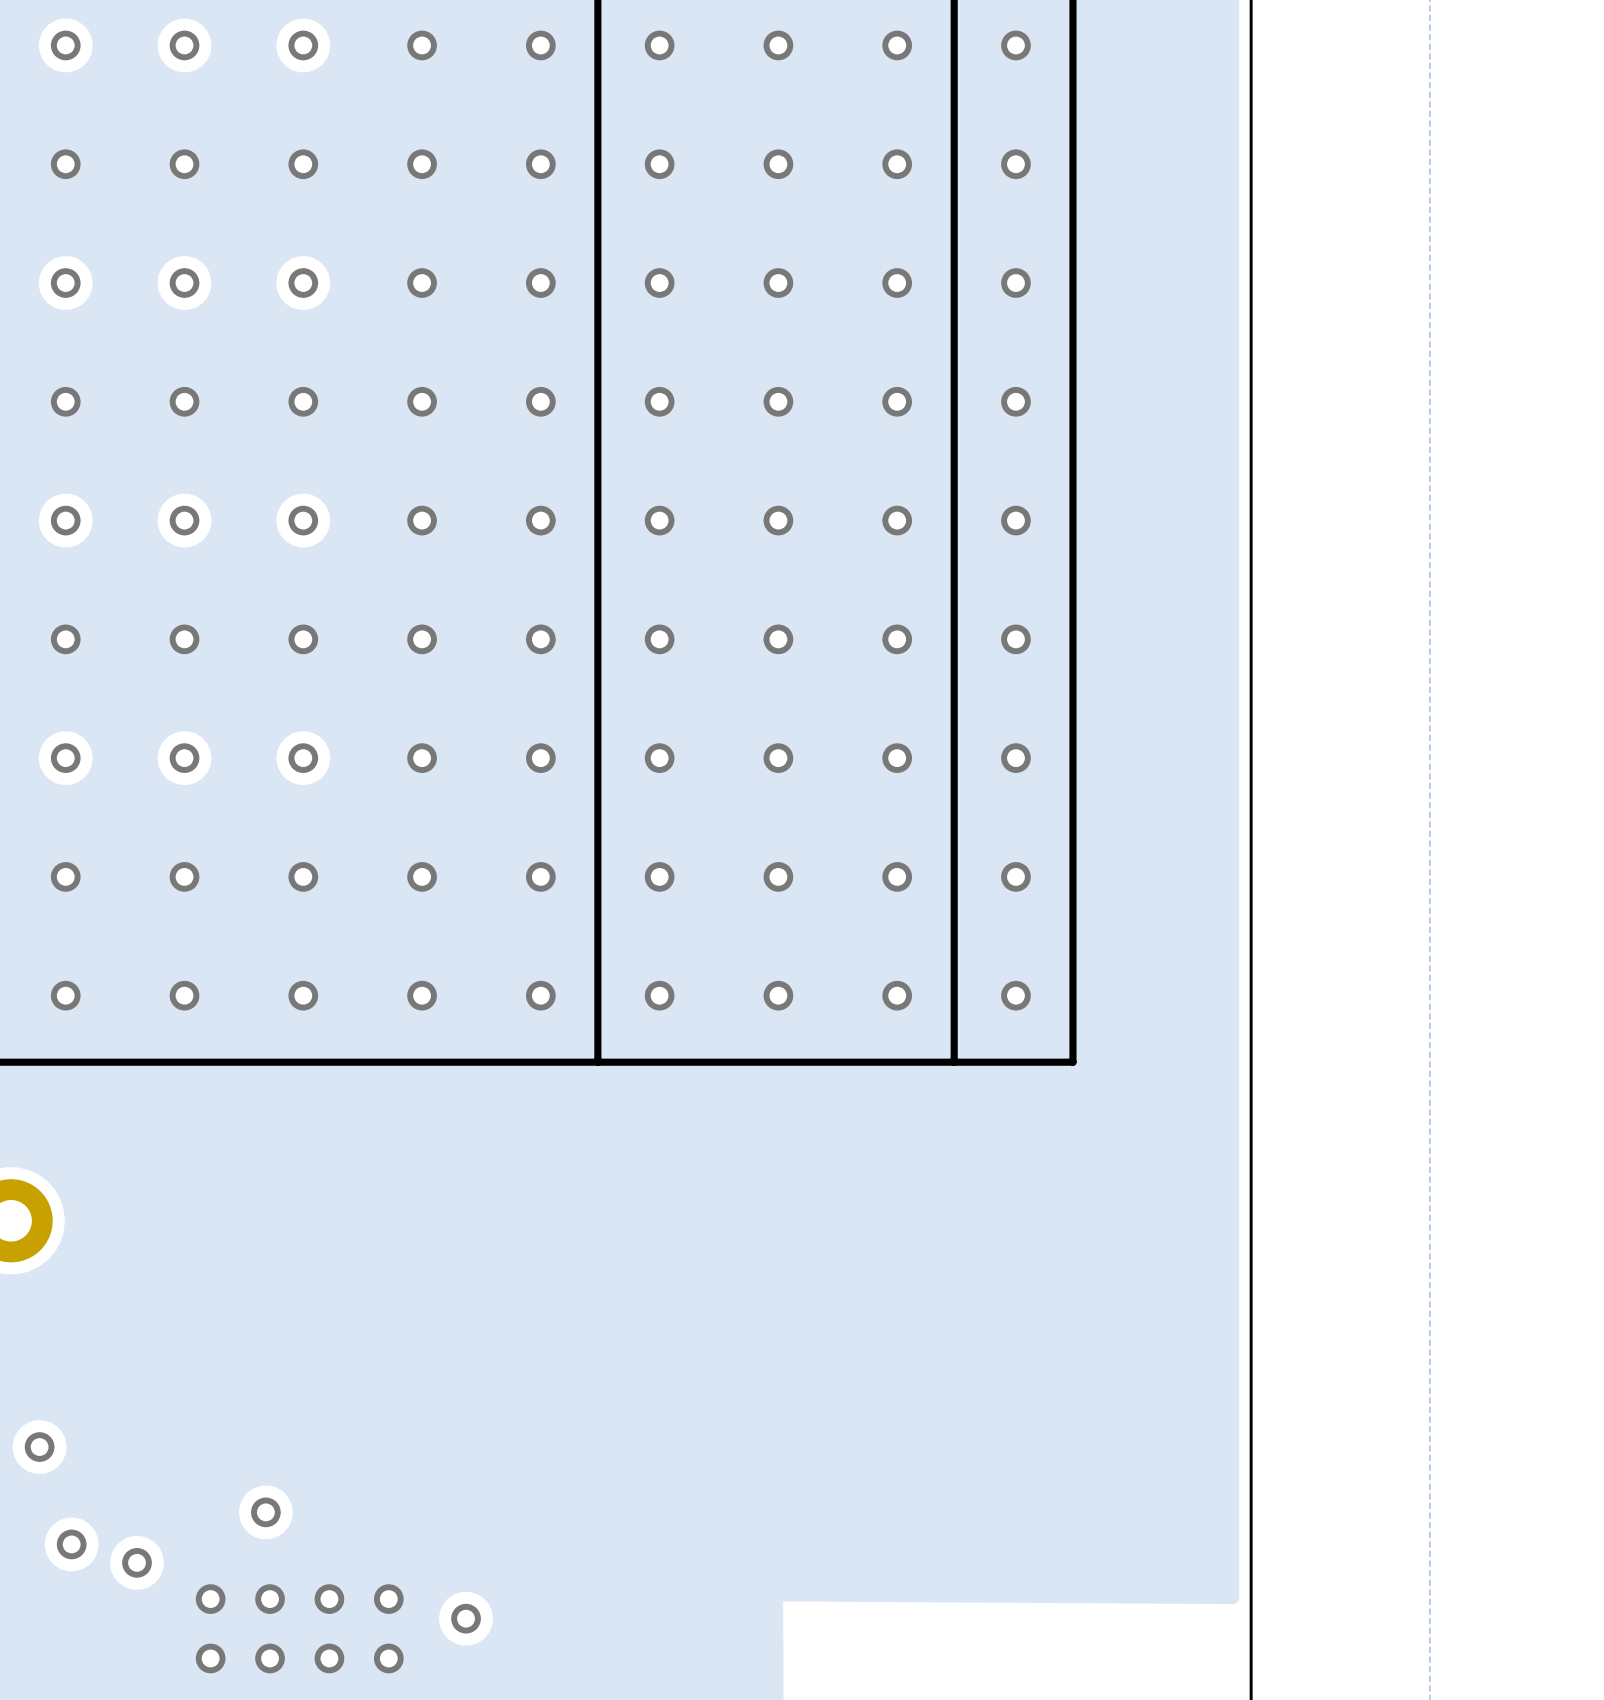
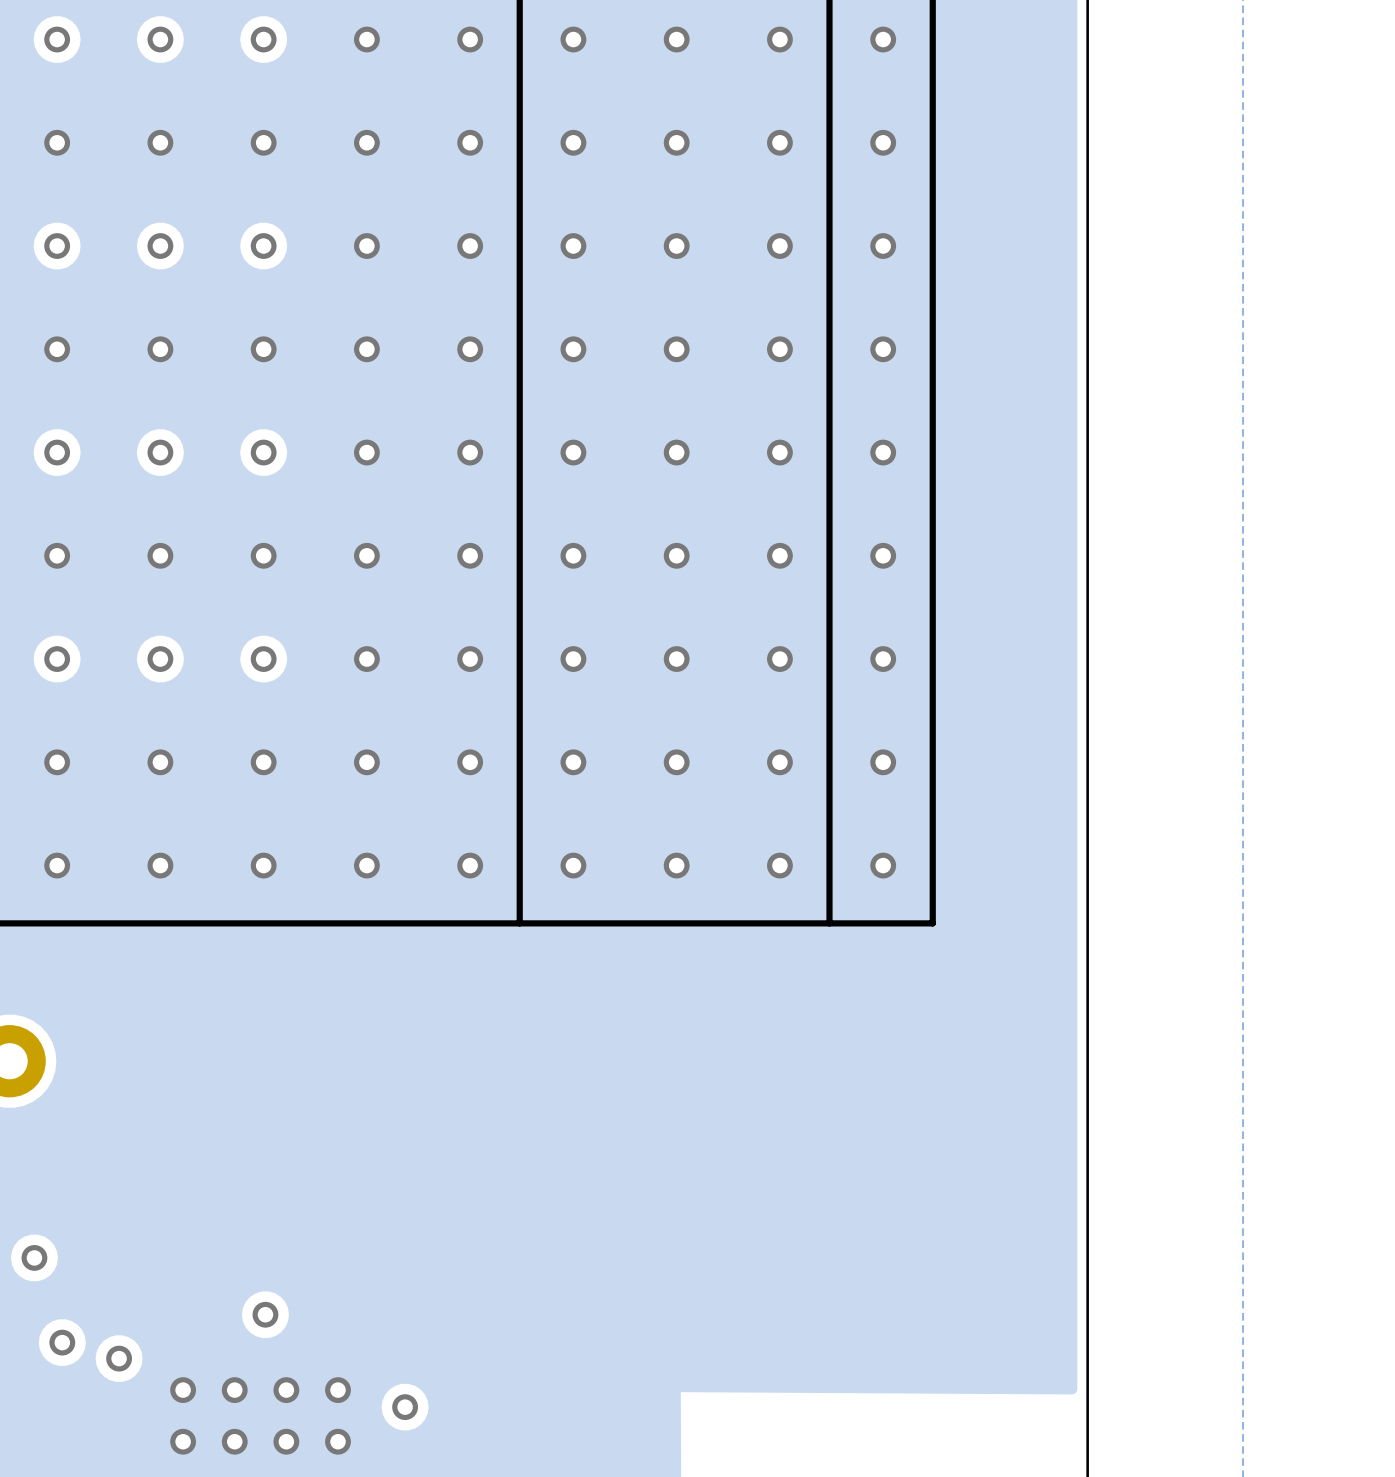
via position: (265, 1512) -> (265, 1314)

